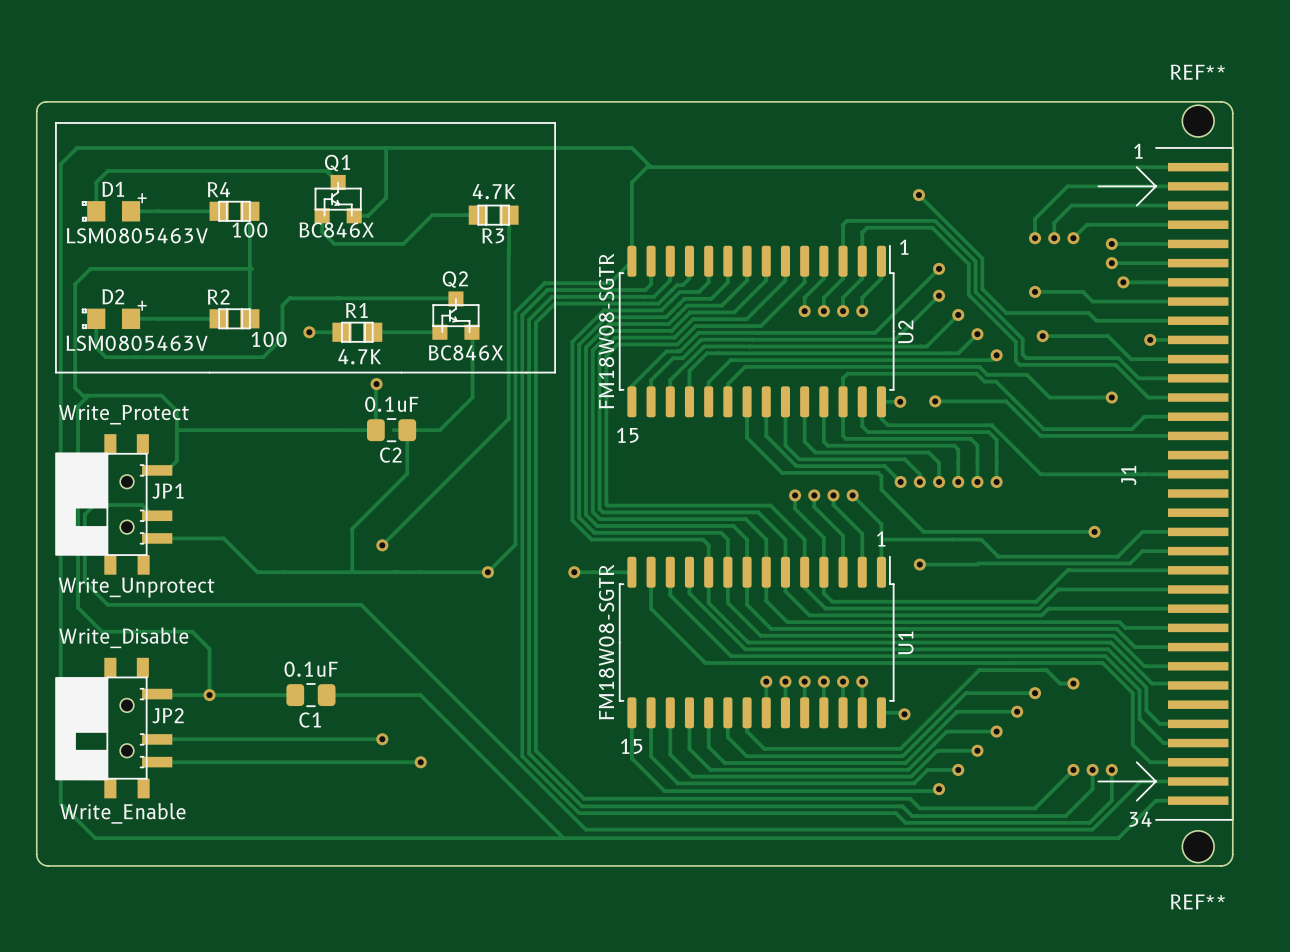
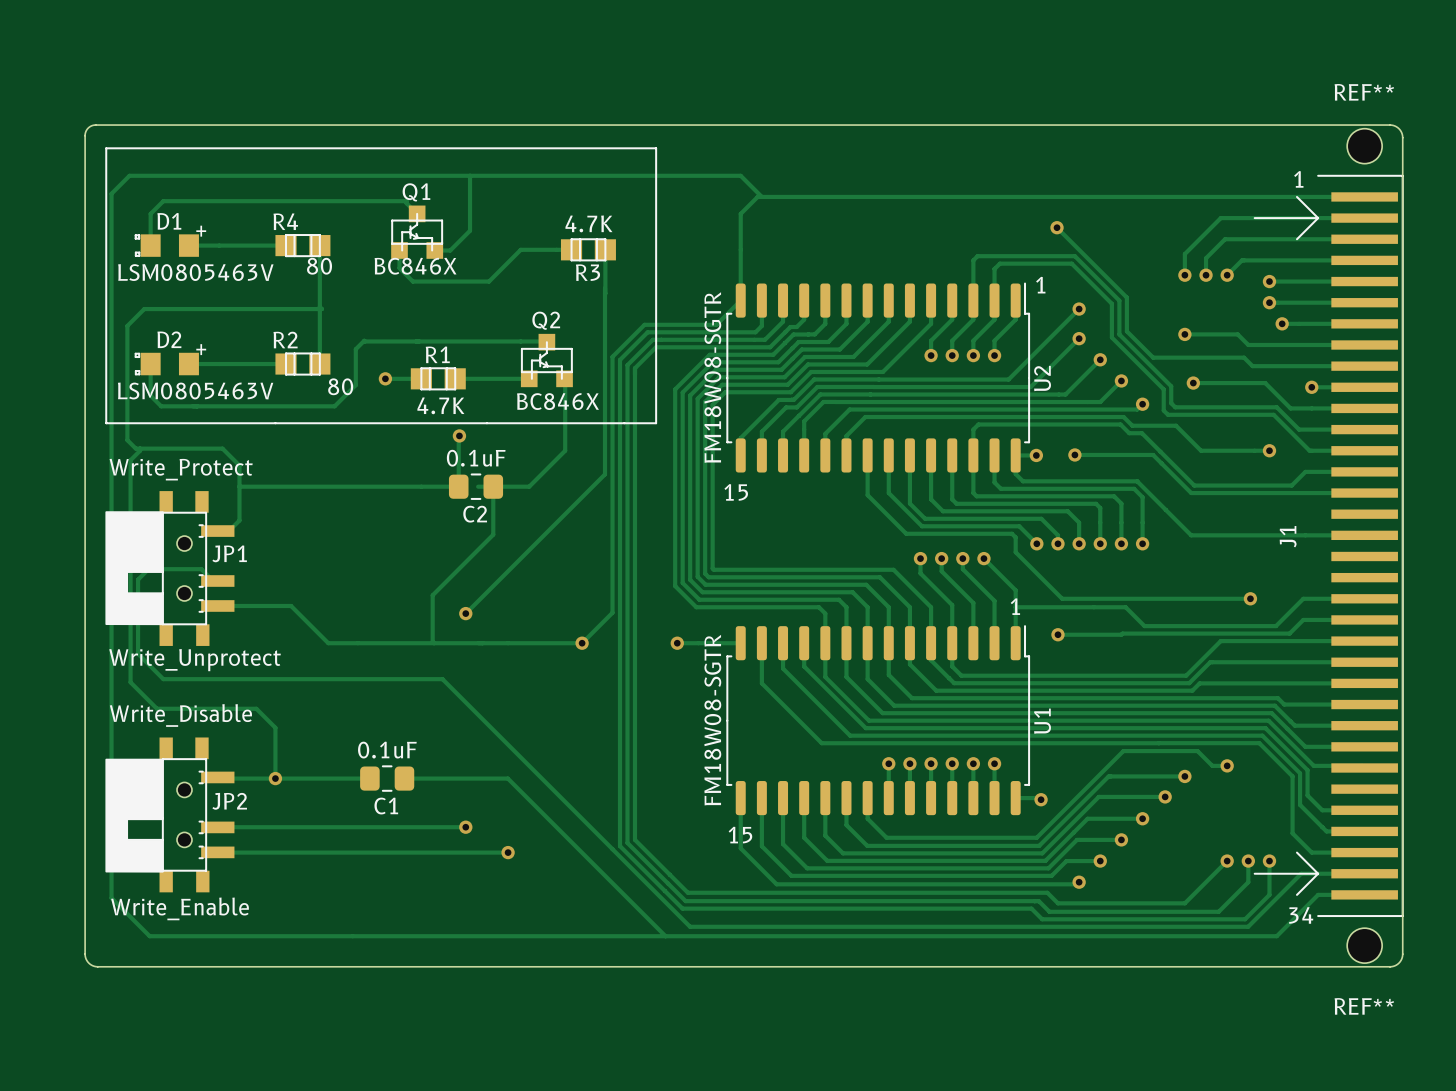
R4 value: 100 (249, 230) -> 80 (319, 266)
R2 value: 100 (269, 339) -> 80 (340, 386)

